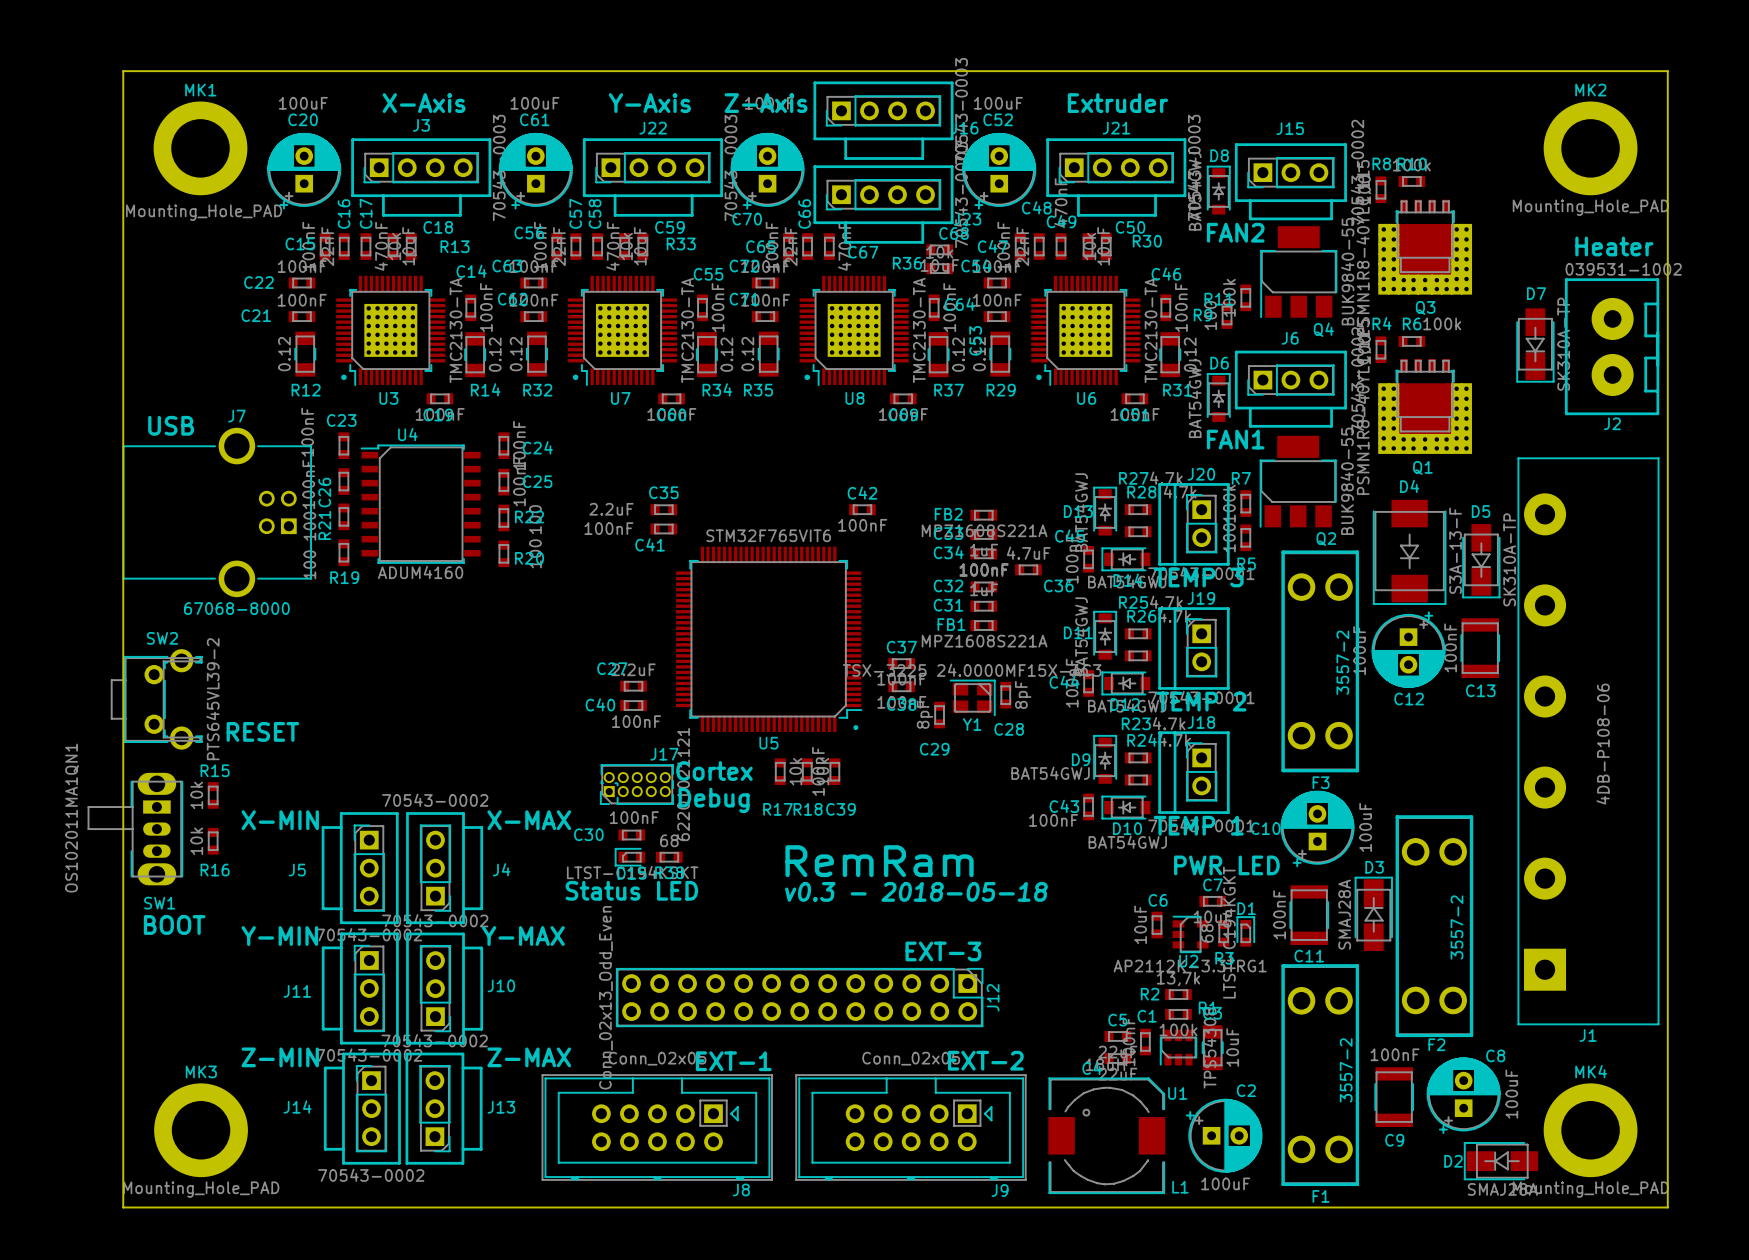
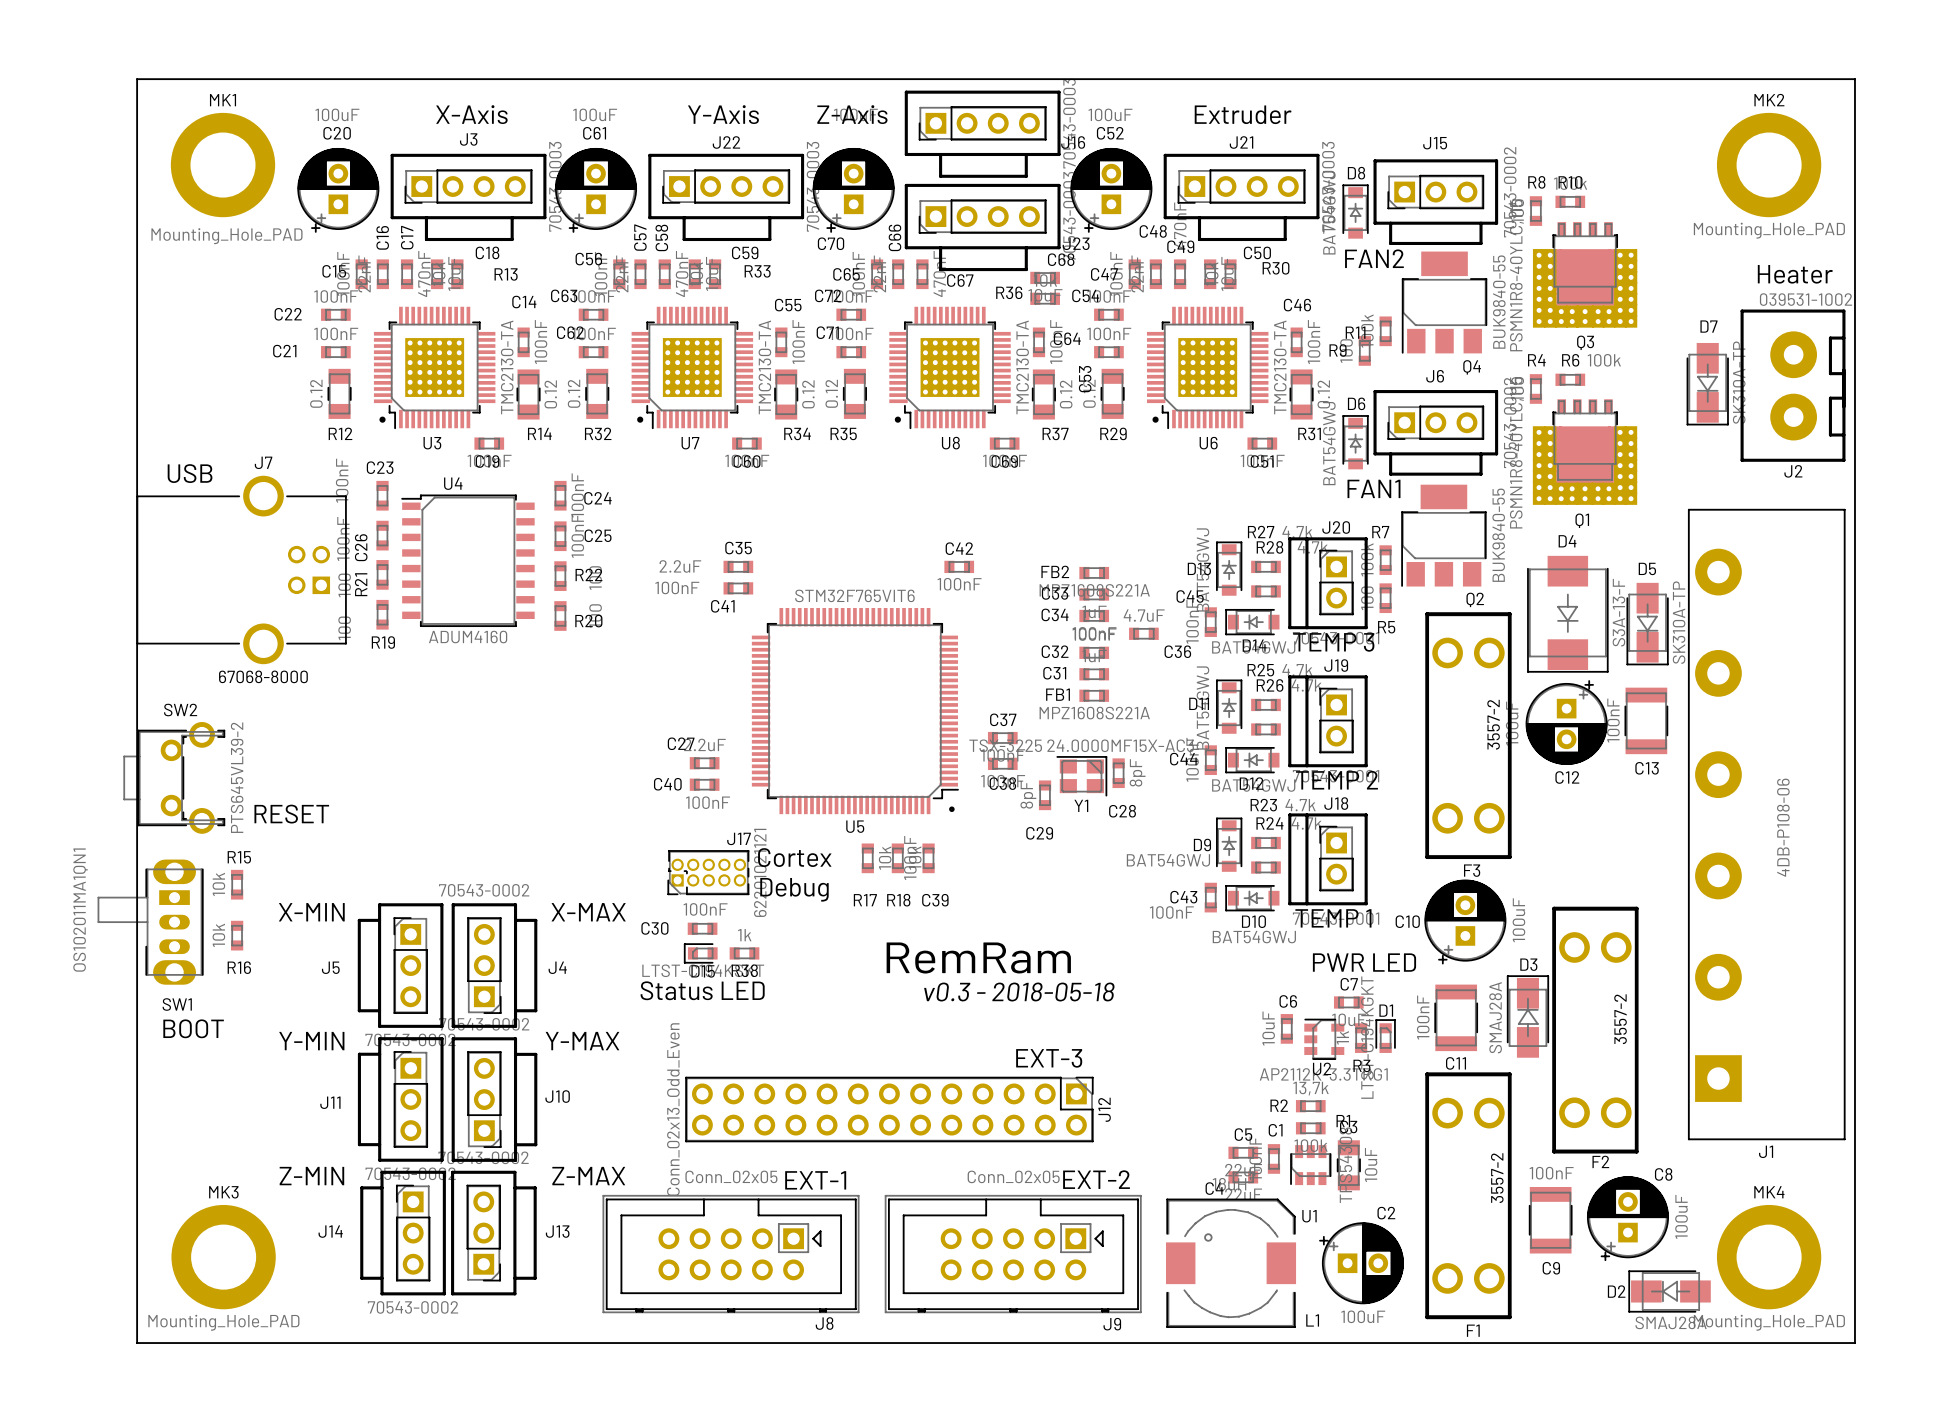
R38 value: 68 (669, 840) -> 1k (744, 935)
R3 value: 68 (1207, 933) -> 1k (1342, 1037)

